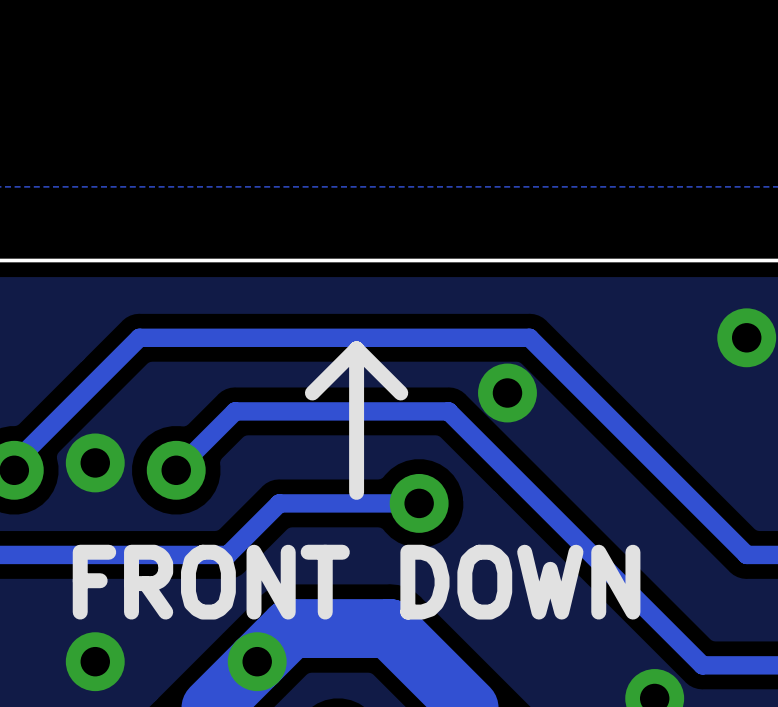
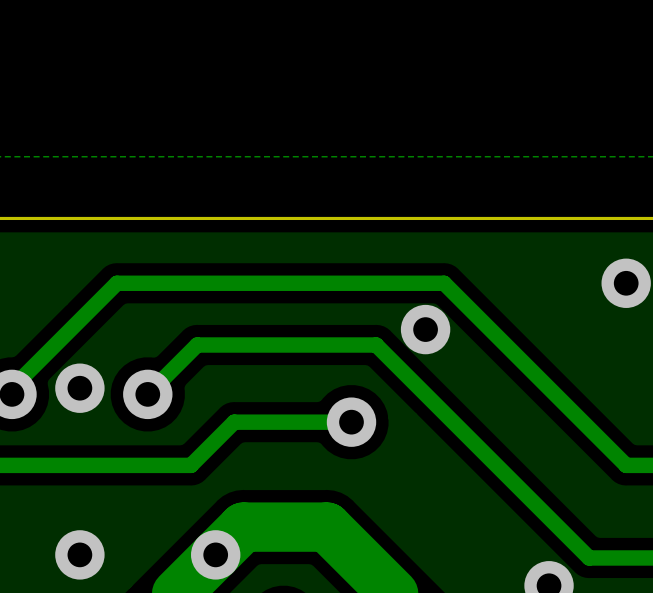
line: (356, 348) (400, 393) -> none
line: (356, 348) (312, 393) -> none
line: (356, 348) (356, 492) -> none
text: FRONT DOWN (356, 582) -> none

